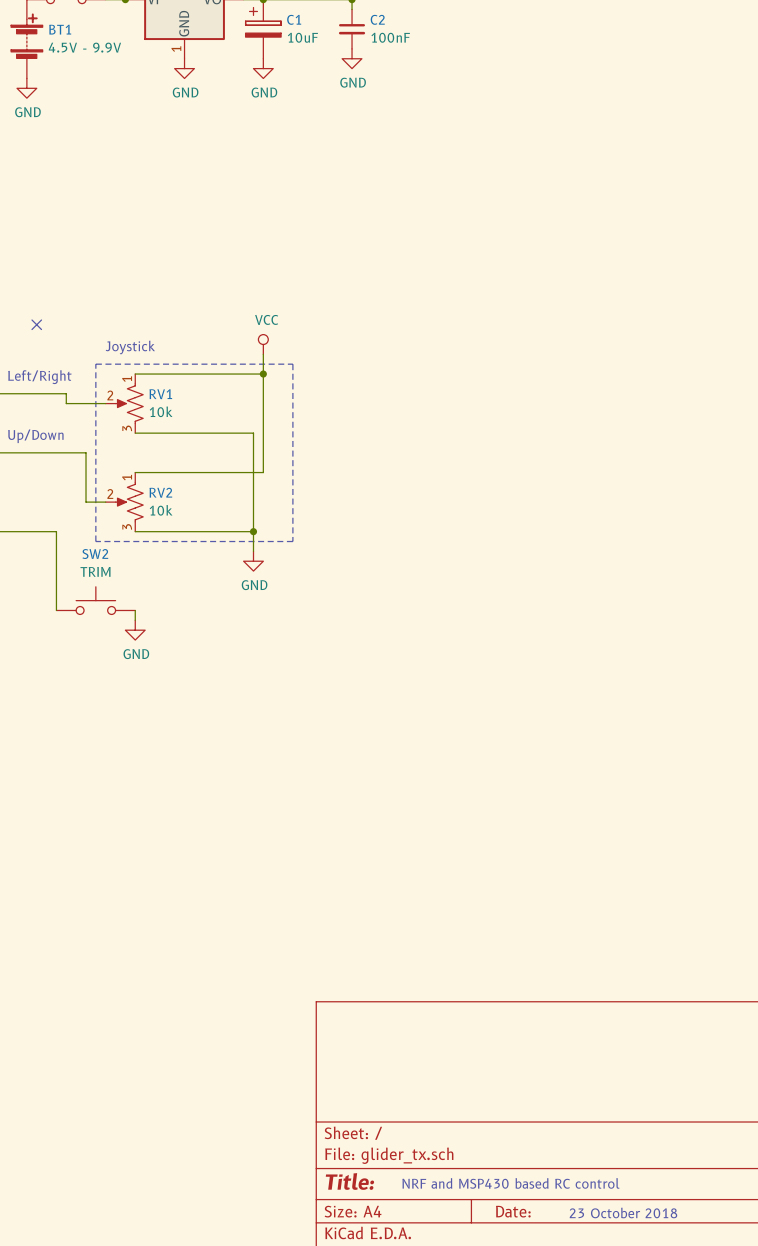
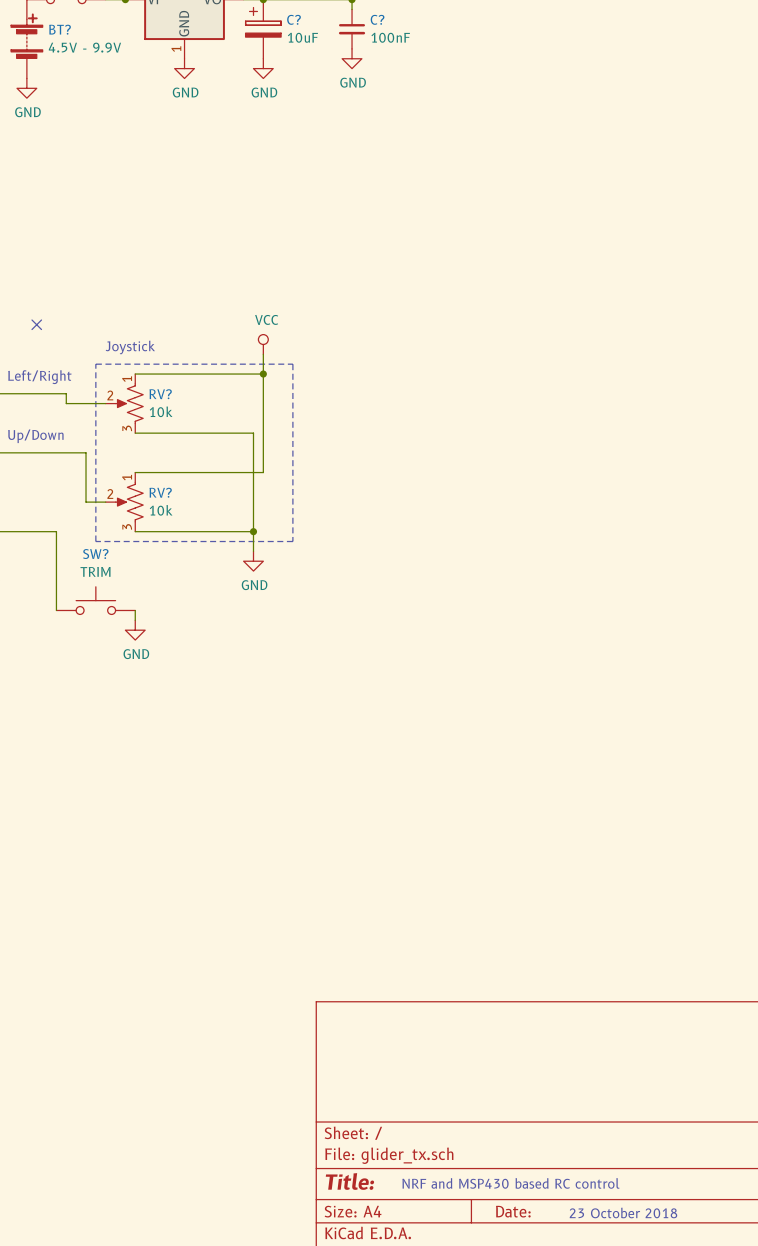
C1 name: C1 (294, 19) -> C? (294, 19)
C2 name: C2 (377, 19) -> C? (377, 19)
BT1 name: BT1 (60, 29) -> BT? (60, 29)
RV1 name: RV1 (160, 394) -> RV? (160, 394)
RV2 name: RV2 (160, 492) -> RV? (160, 492)
SW2 name: SW2 (95, 554) -> SW? (95, 554)

